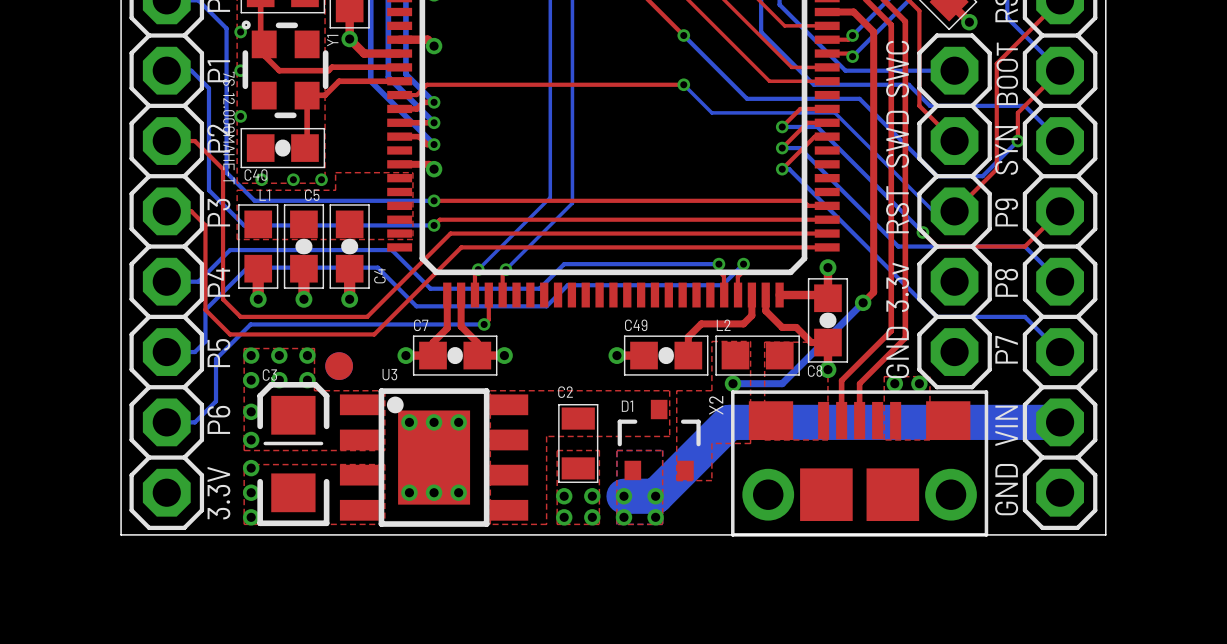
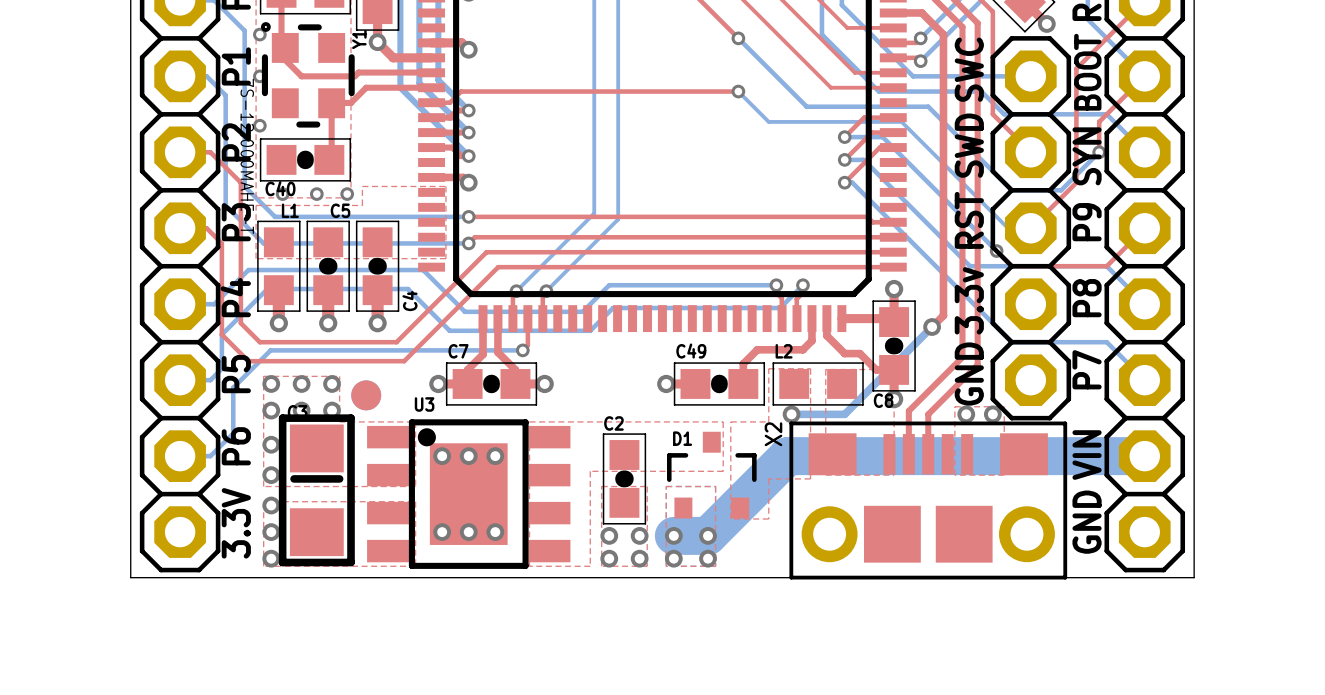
C3 footprint: [257, 382, 330, 527] -> [289, 424, 344, 557]
line: none -> (282, 418) (351, 418) (351, 562) (282, 562) (282, 418)
C2 footprint: [558, 404, 599, 483] -> [602, 433, 647, 525]
line: none -> (294, 478) (339, 478)

